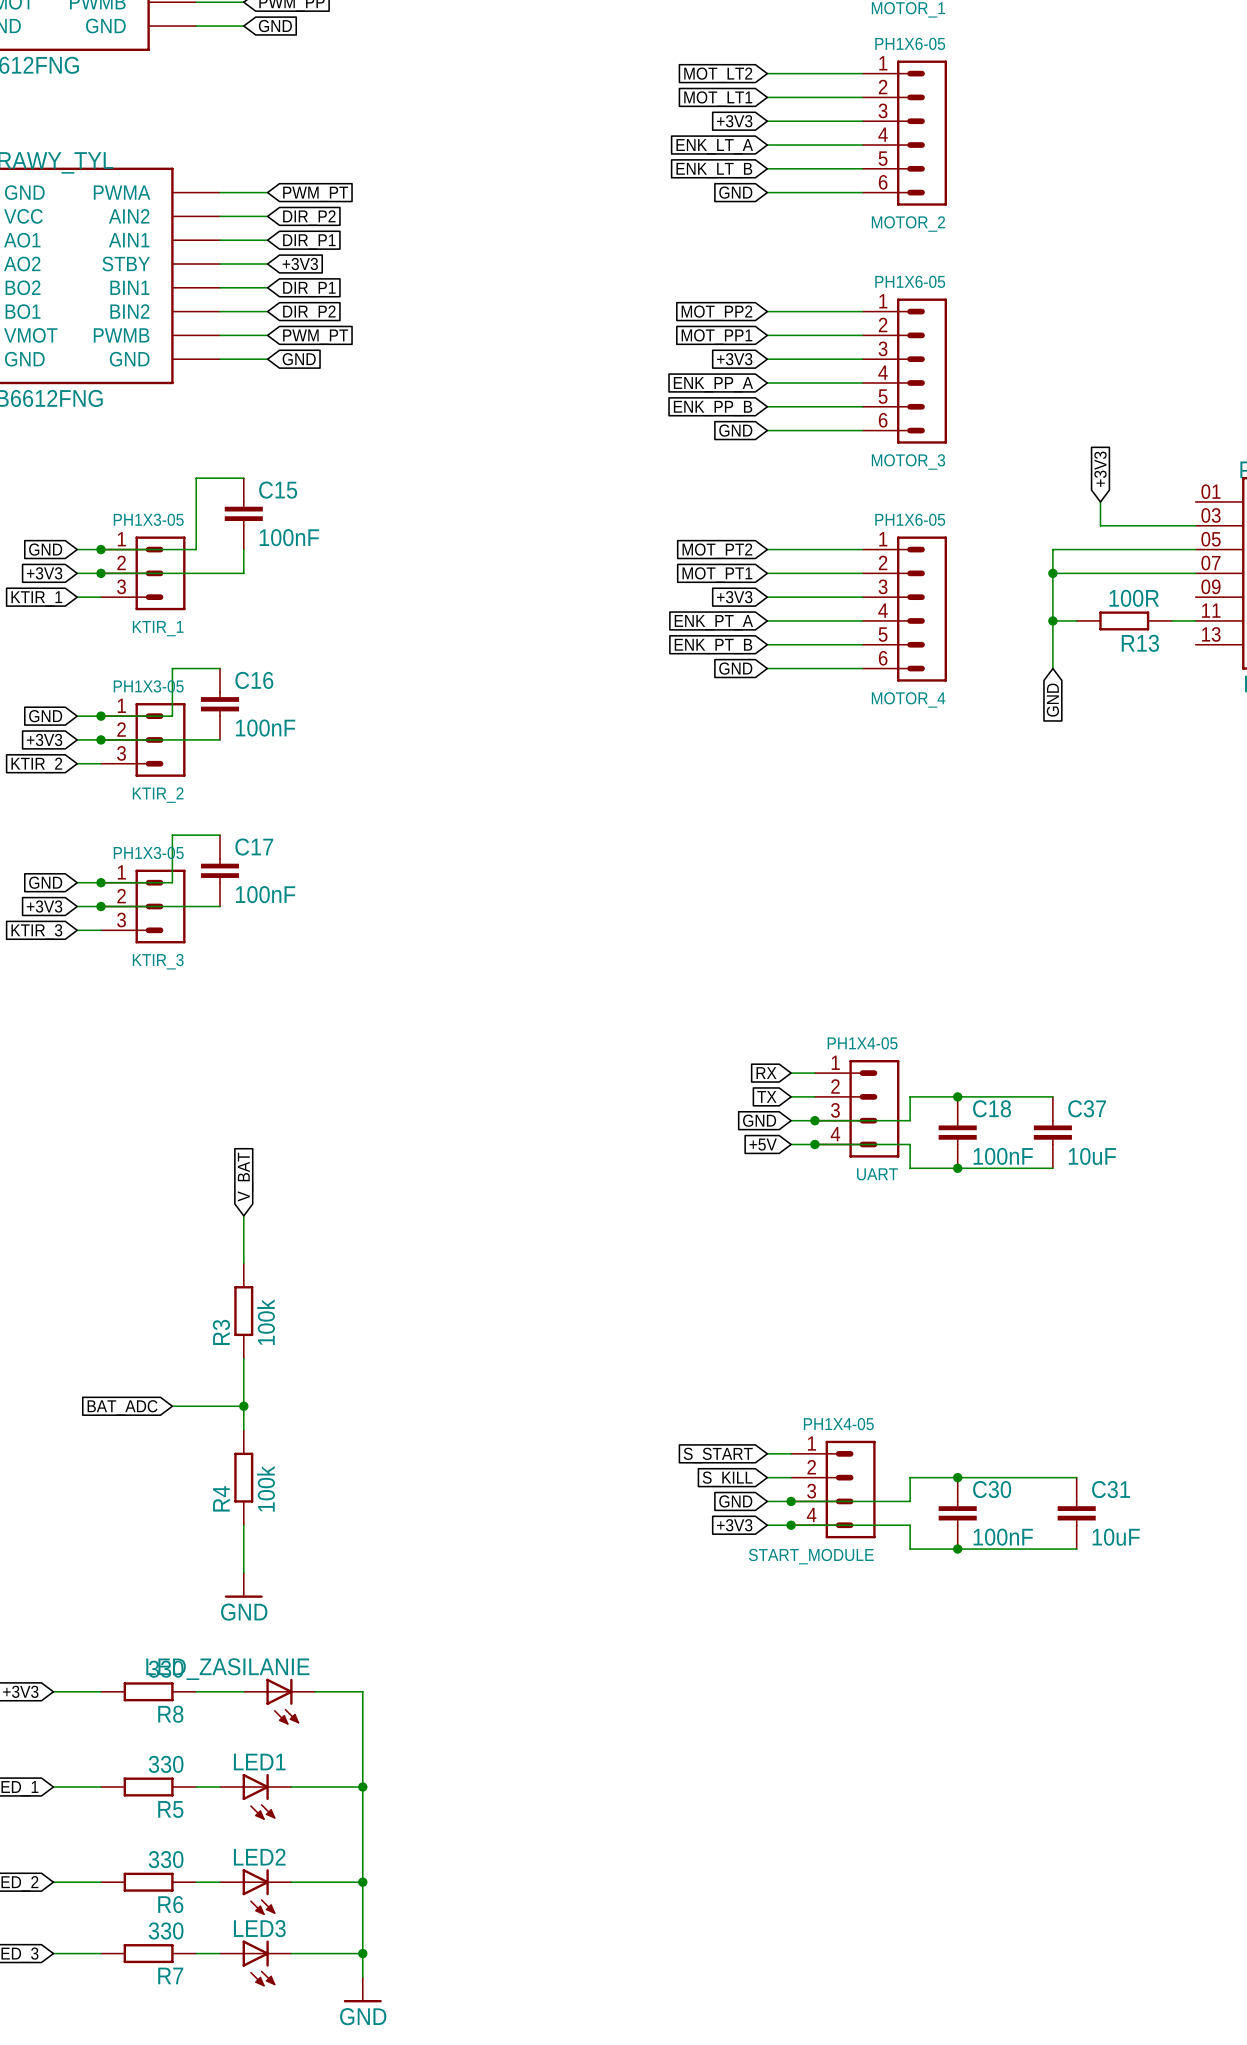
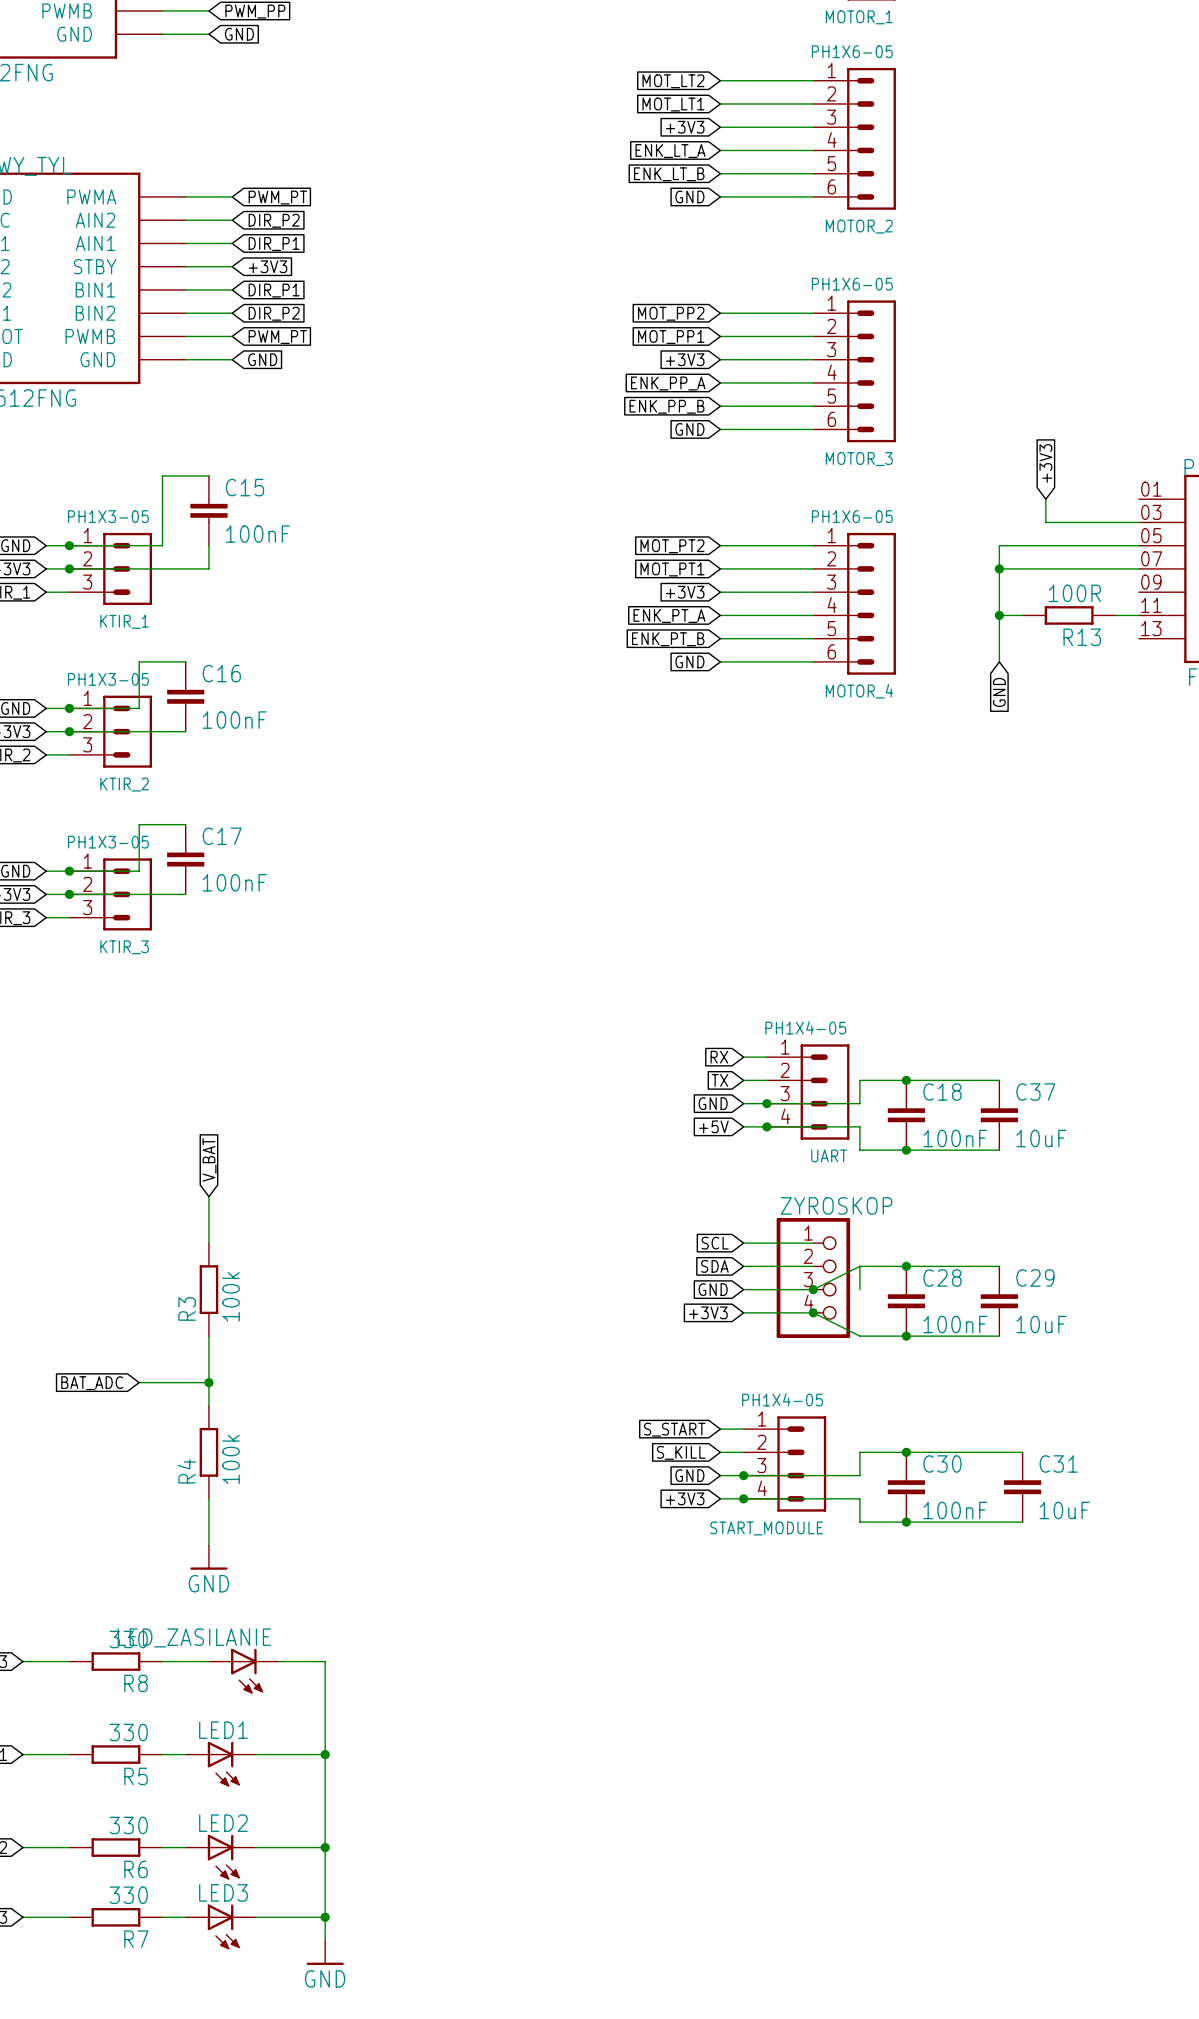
global label: none -> SCL (715, 1243)
wire: none -> (743, 1243) (813, 1243)
global label: none -> SDA (714, 1266)
wire: none -> (743, 1266) (813, 1266)
wire: none -> (859, 1266) (999, 1266)
wire: none -> (859, 1266) (859, 1289)
wire: none -> (859, 1266) (813, 1289) (743, 1289)
junction: none -> (906, 1266)
ZYROSKOP: none -> (813, 1278)
global label: none -> GND (713, 1289)
junction: none -> (813, 1289)
C28: none -> 100nF (906, 1301)
C29: none -> 10uF (999, 1301)
global label: none -> +3V3 (708, 1312)
wire: none -> (743, 1312) (813, 1312) (859, 1336) (999, 1336)
junction: none -> (813, 1312)
junction: none -> (906, 1336)

